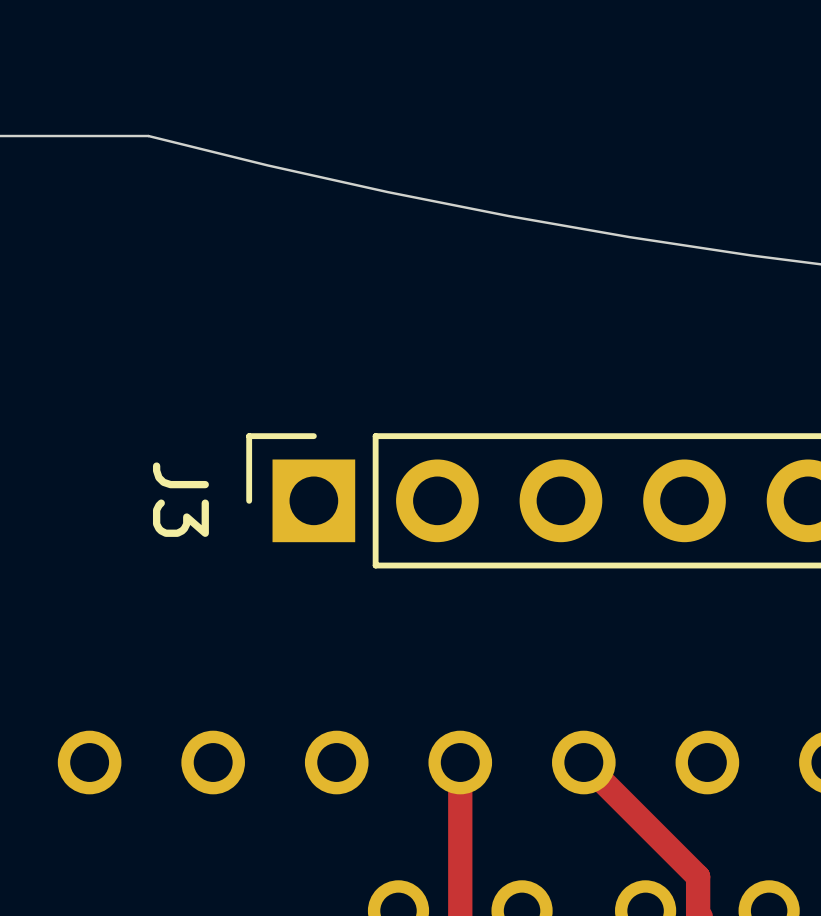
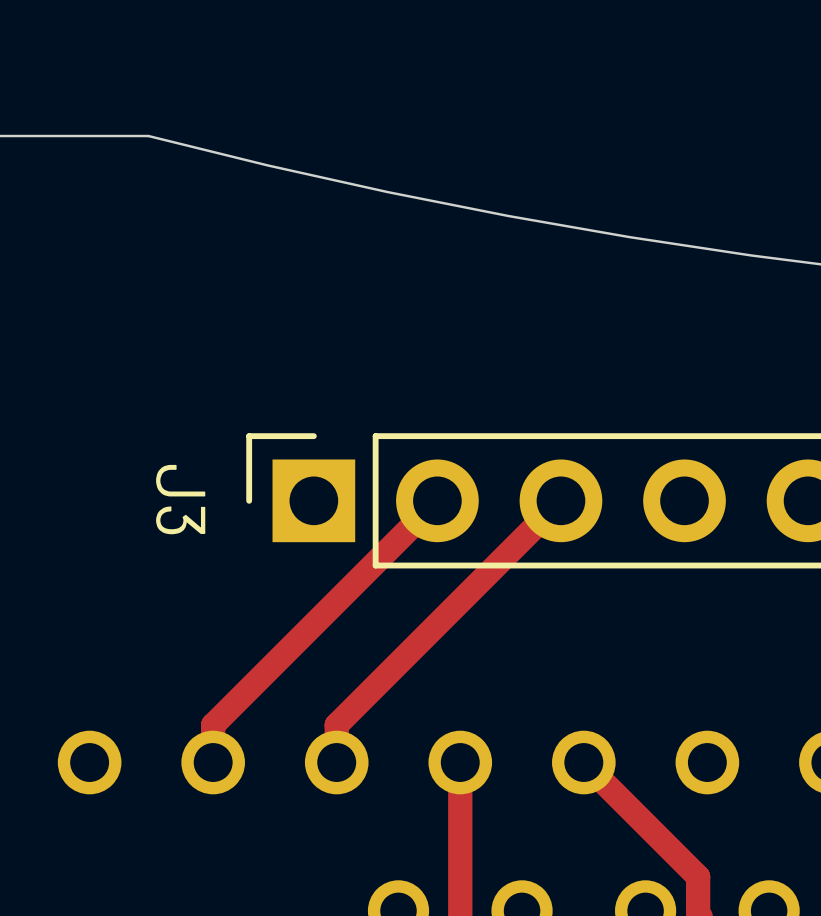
top track: none -> (437, 500) (213, 725) (213, 762)
top track: none -> (560, 500) (336, 725) (336, 762)

